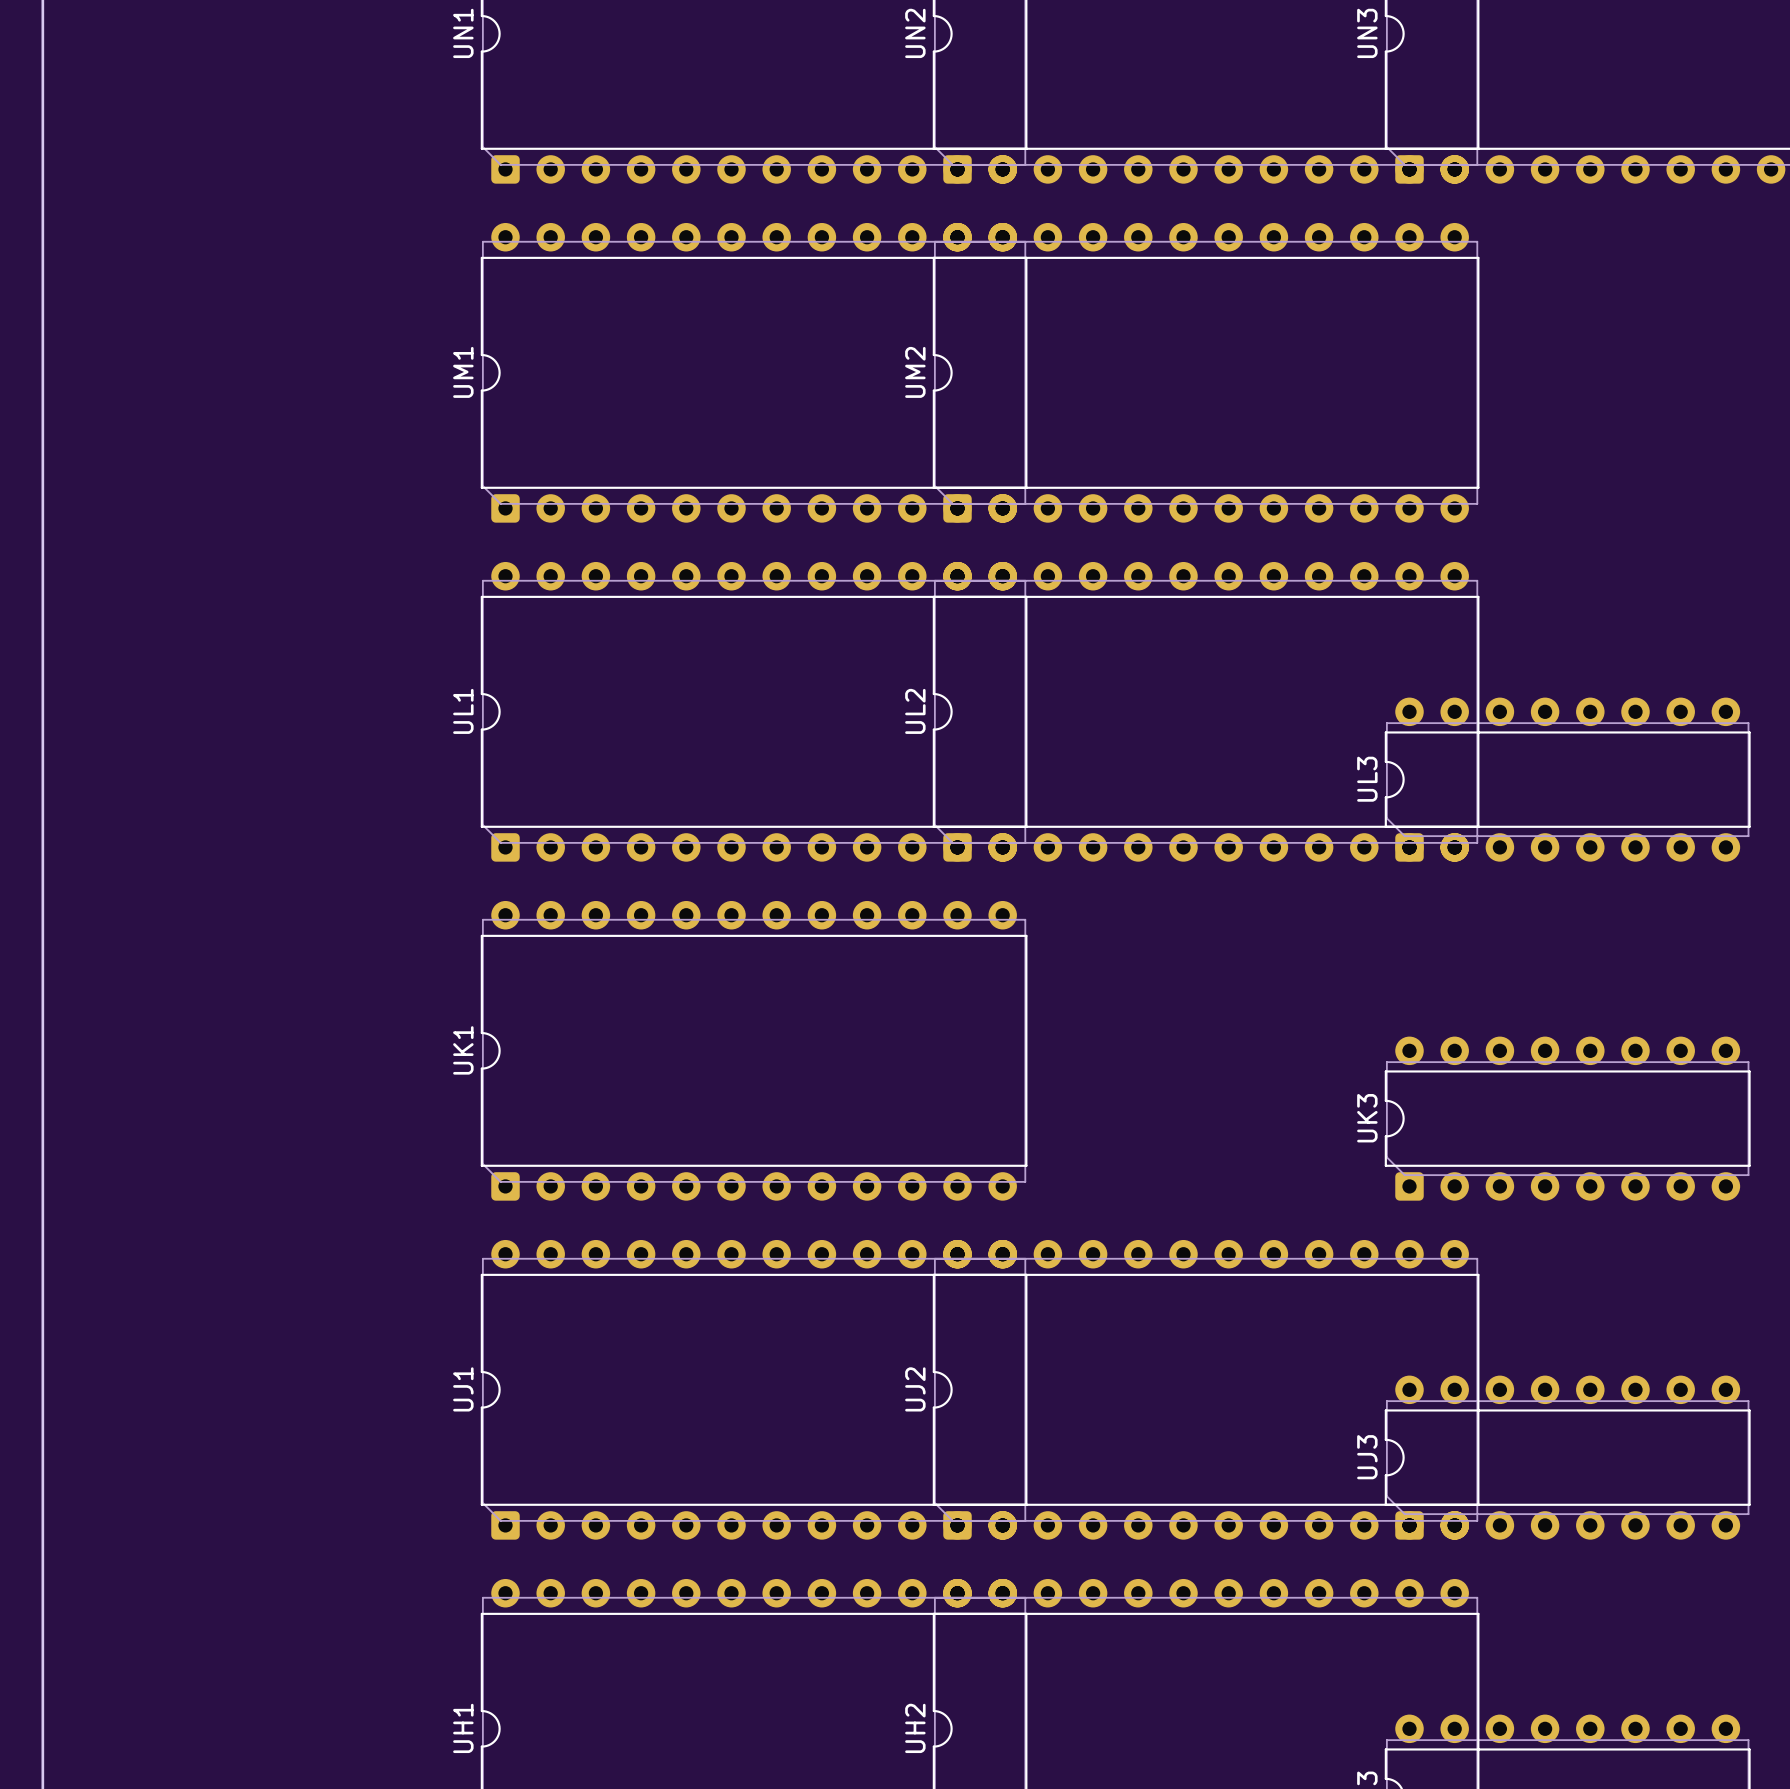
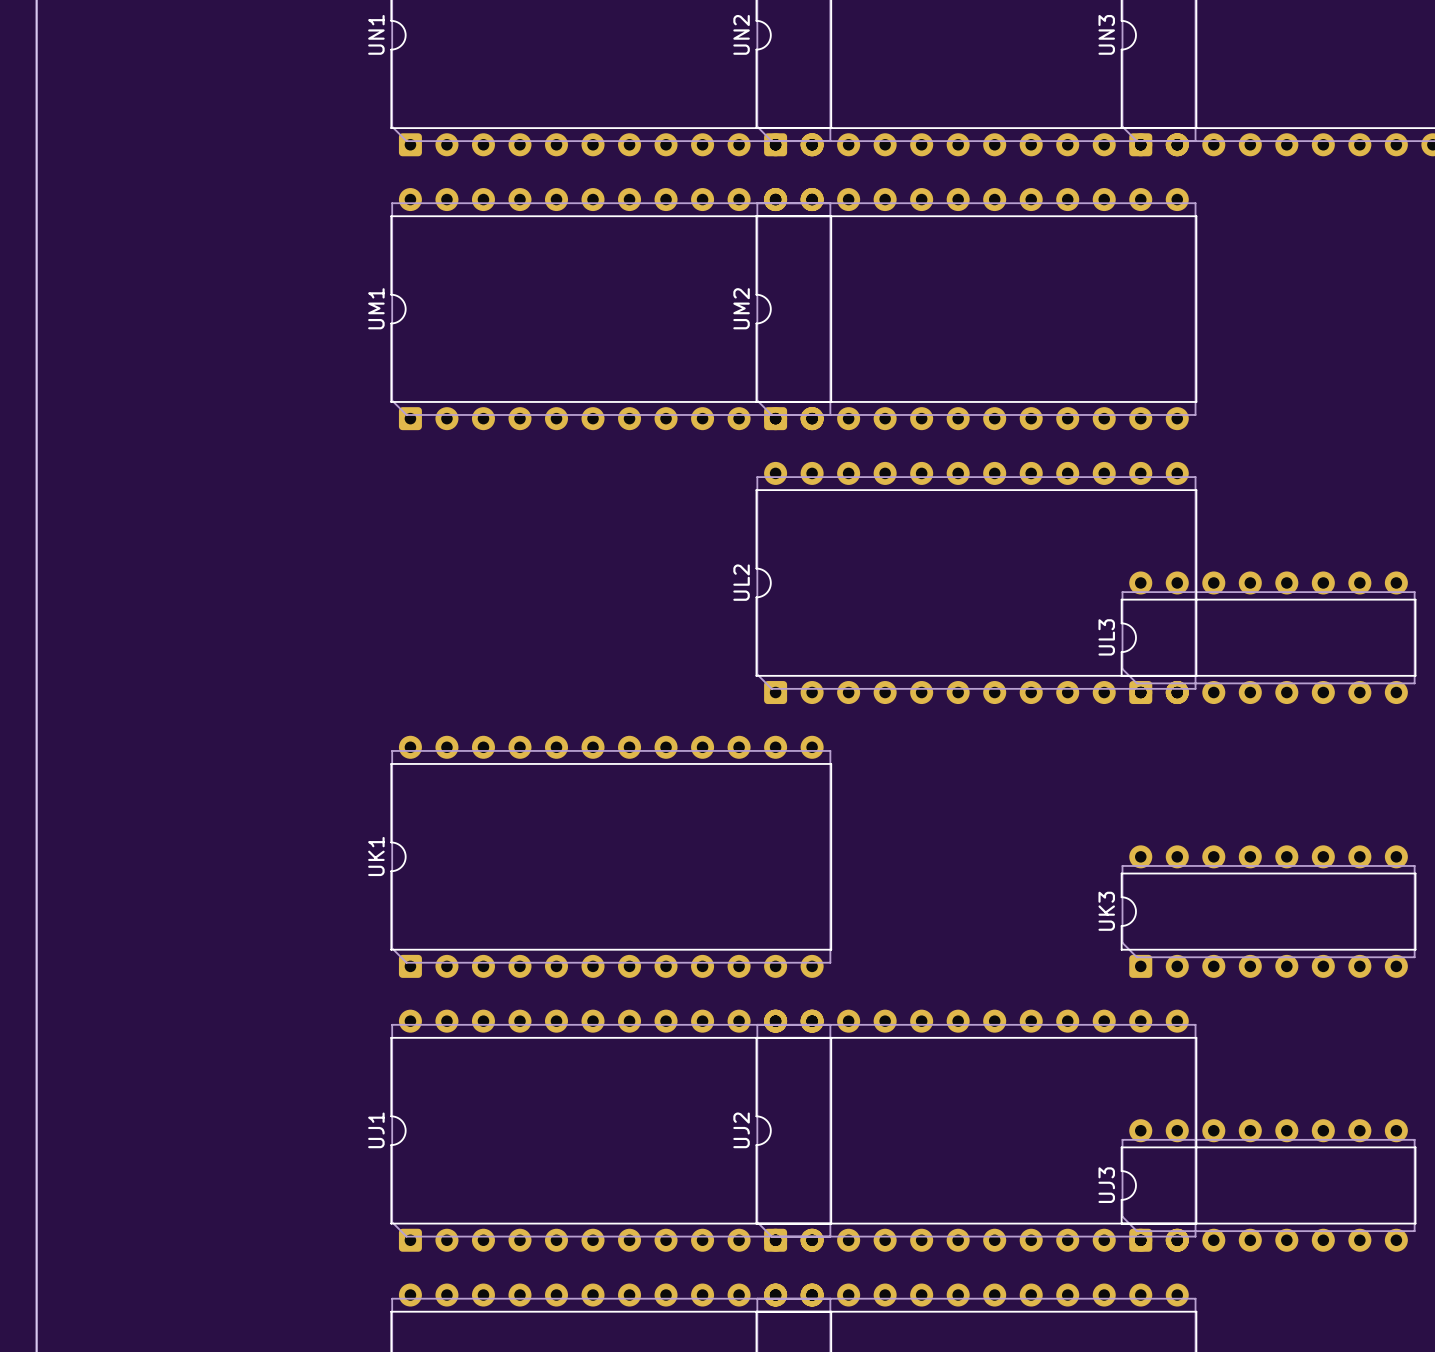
UL1: (754, 711) -> none

